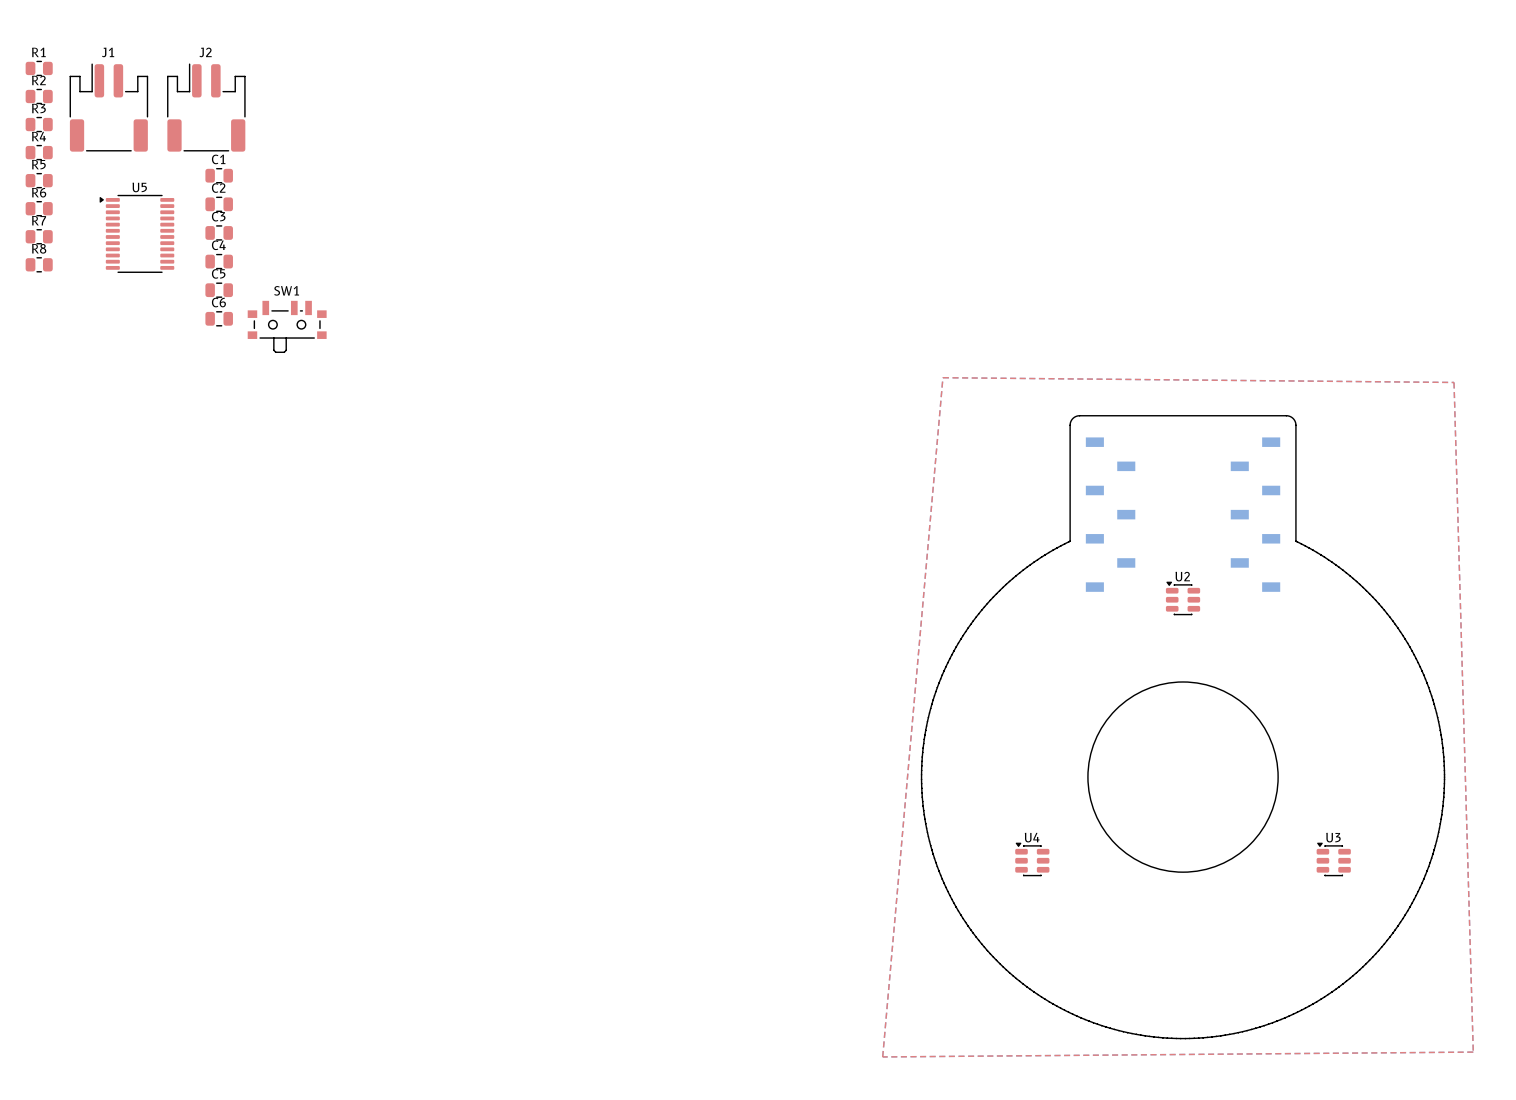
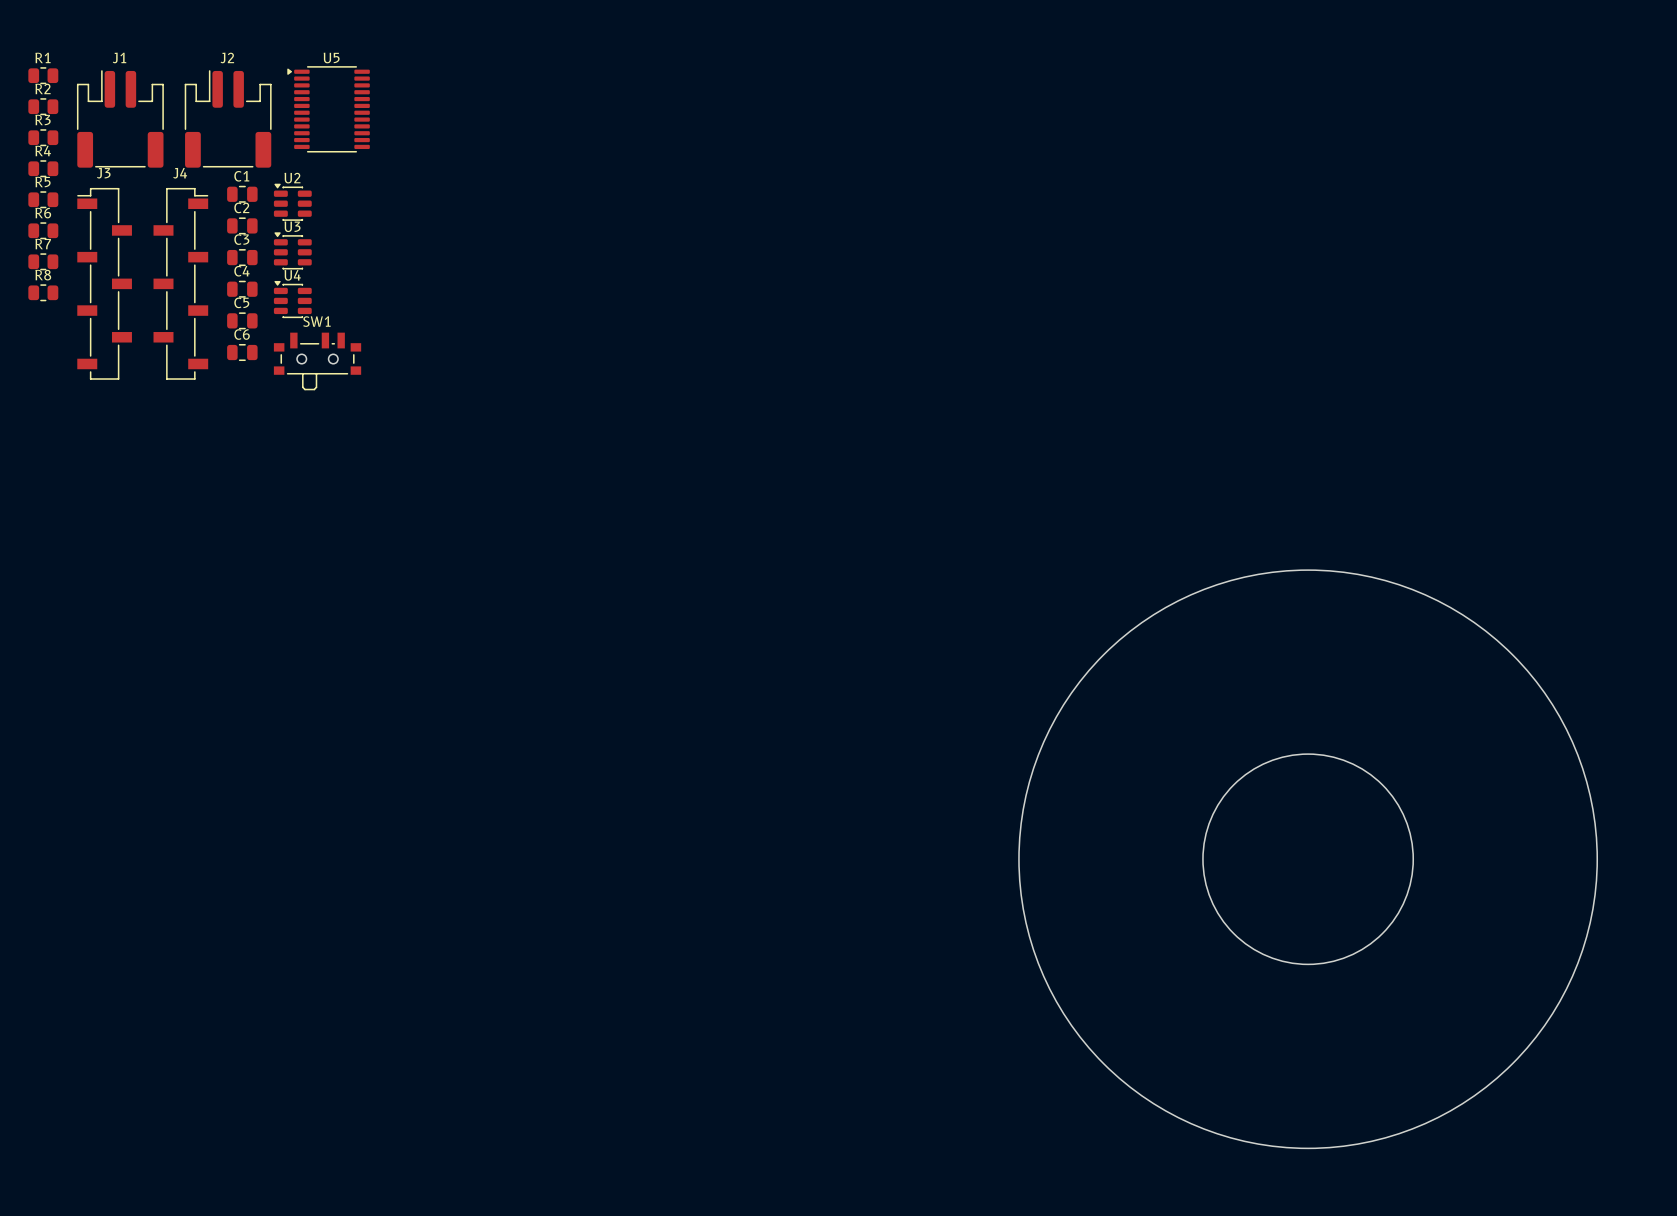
U5 position: (136, 233) -> (328, 109)
J3: none -> (104, 283)
J4: none -> (180, 283)
top zone outline: (942, 377) (1454, 382) (1473, 1052) (882, 1056) (942, 377) -> none
part: (1110, 514) -> none
part: (1255, 514) -> none
round board edge: none -> [1018, 569, 1598, 1149]
U2 position: (1183, 598) -> (292, 202)
board edge: (1444, 777) (1441, 739) (1434, 704) (1421, 670) (1405, 639) (1381, 606) (1356, 581) (1328, 559) (1295, 541) (1295, 424) (1292, 417) (1286, 415) (1079, 415) (1072, 418) (1070, 425) (1070, 541) (1037, 559) (1009, 581) (984, 606) (963, 635) (944, 670) (931, 704) (924, 739) (921, 774) (926, 828) (940, 875) (963, 918) (996, 960) (1037, 994) (1080, 1017) (1131, 1033) (1180, 1038) (1233, 1033) (1281, 1019) (1328, 994) (1366, 963) (1400, 922) (1423, 879) (1439, 828) (1444, 777) -> none
U4 position: (1032, 859) -> (292, 299)
U3 position: (1333, 859) -> (292, 250)

